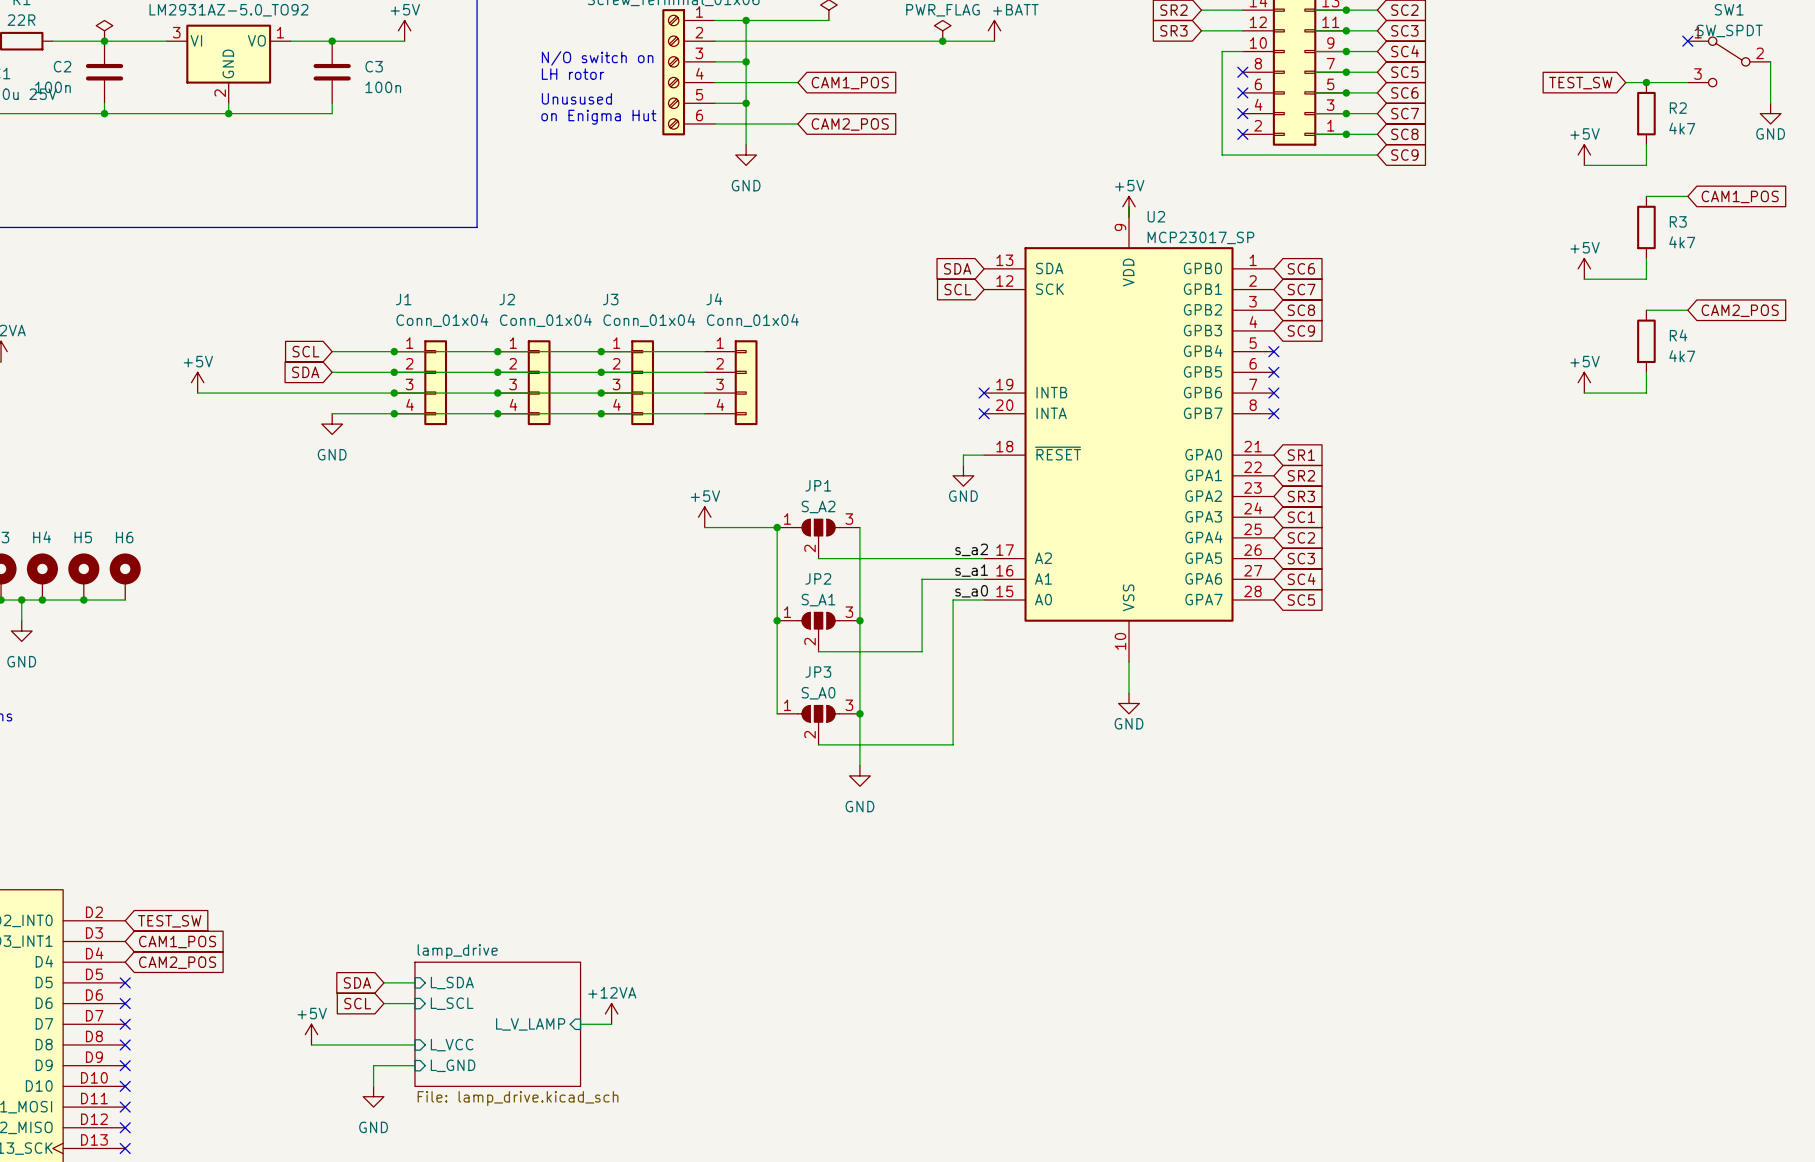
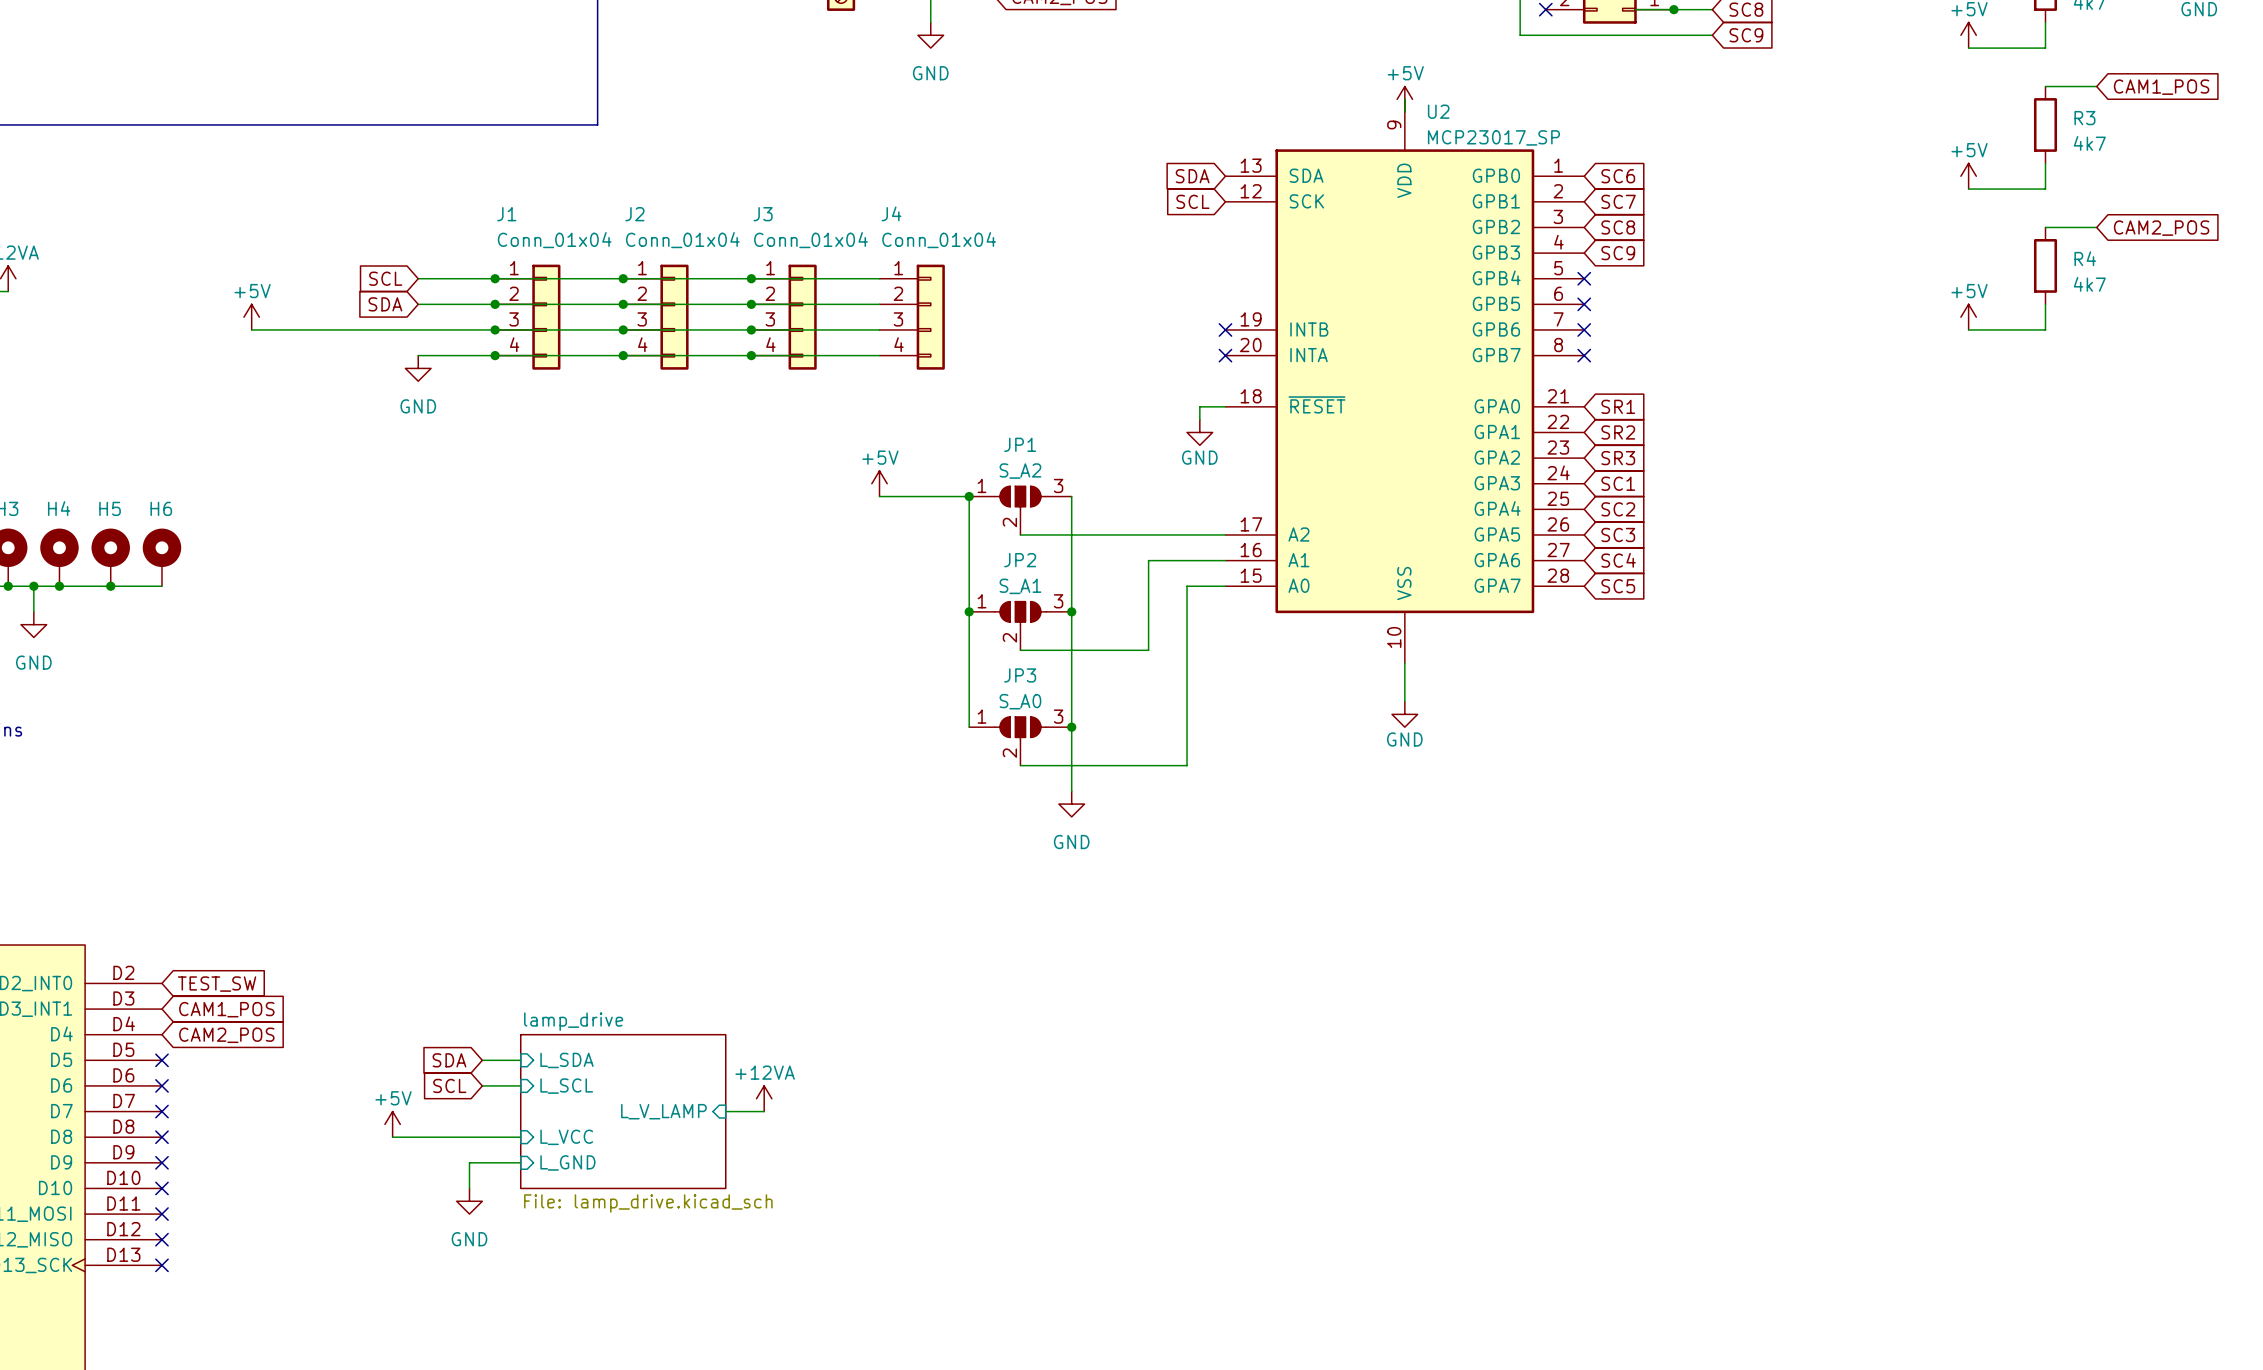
label: s_a2 (971, 549) -> none
label: s_a1 (971, 570) -> none
label: s_a0 (971, 591) -> none

